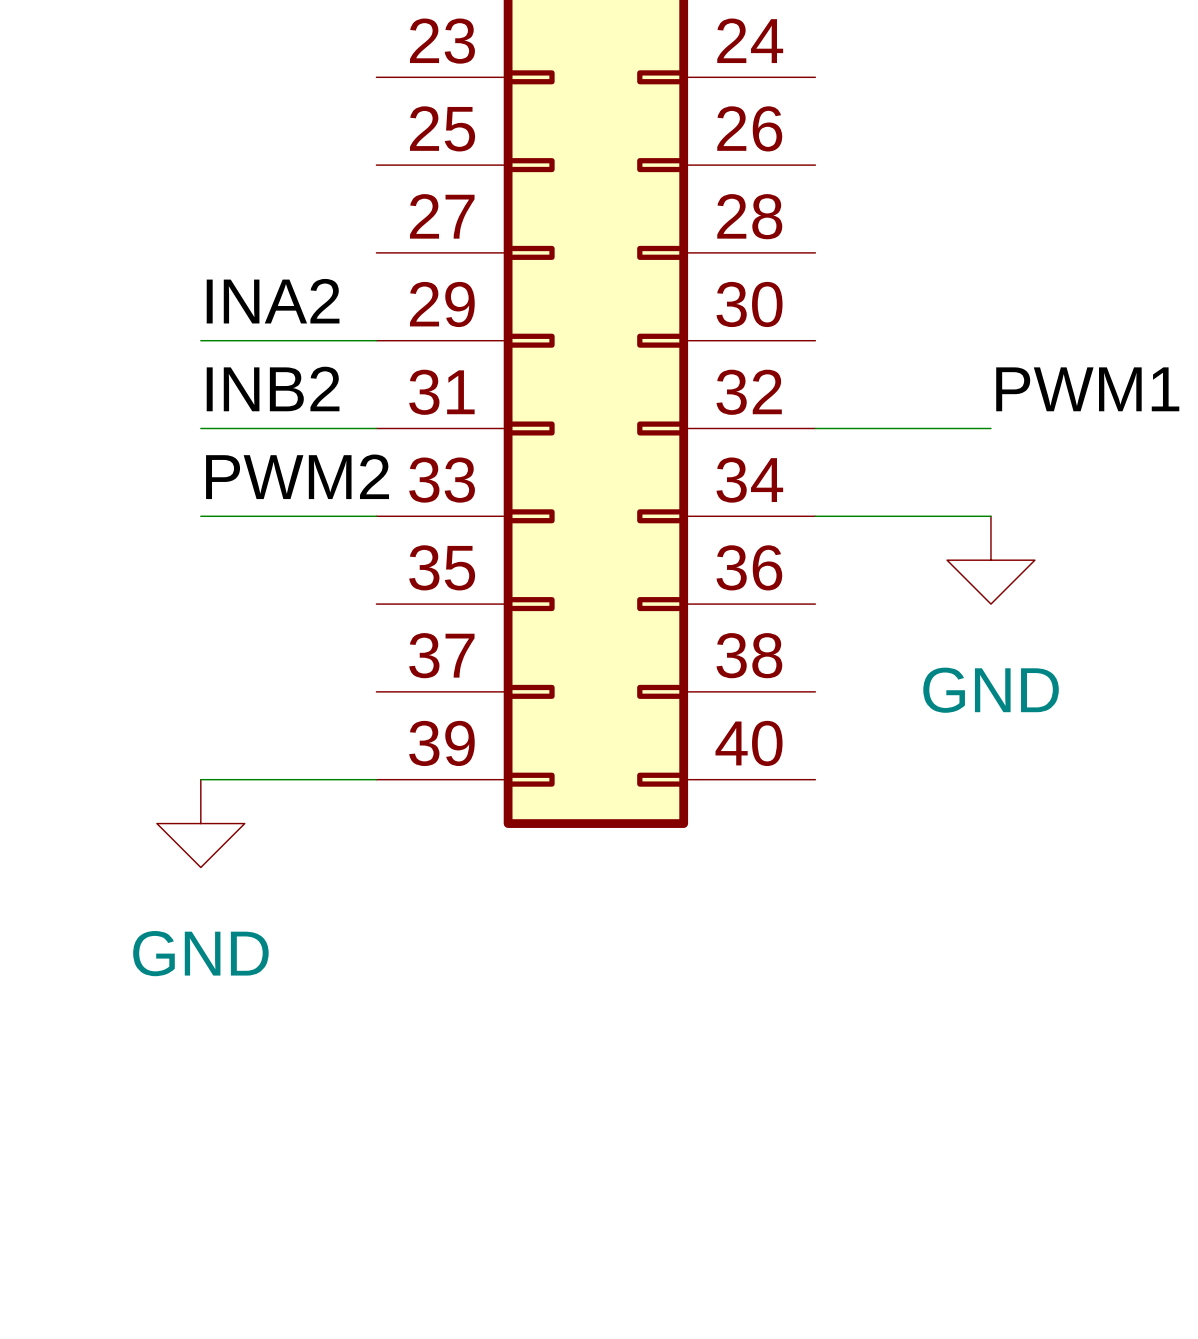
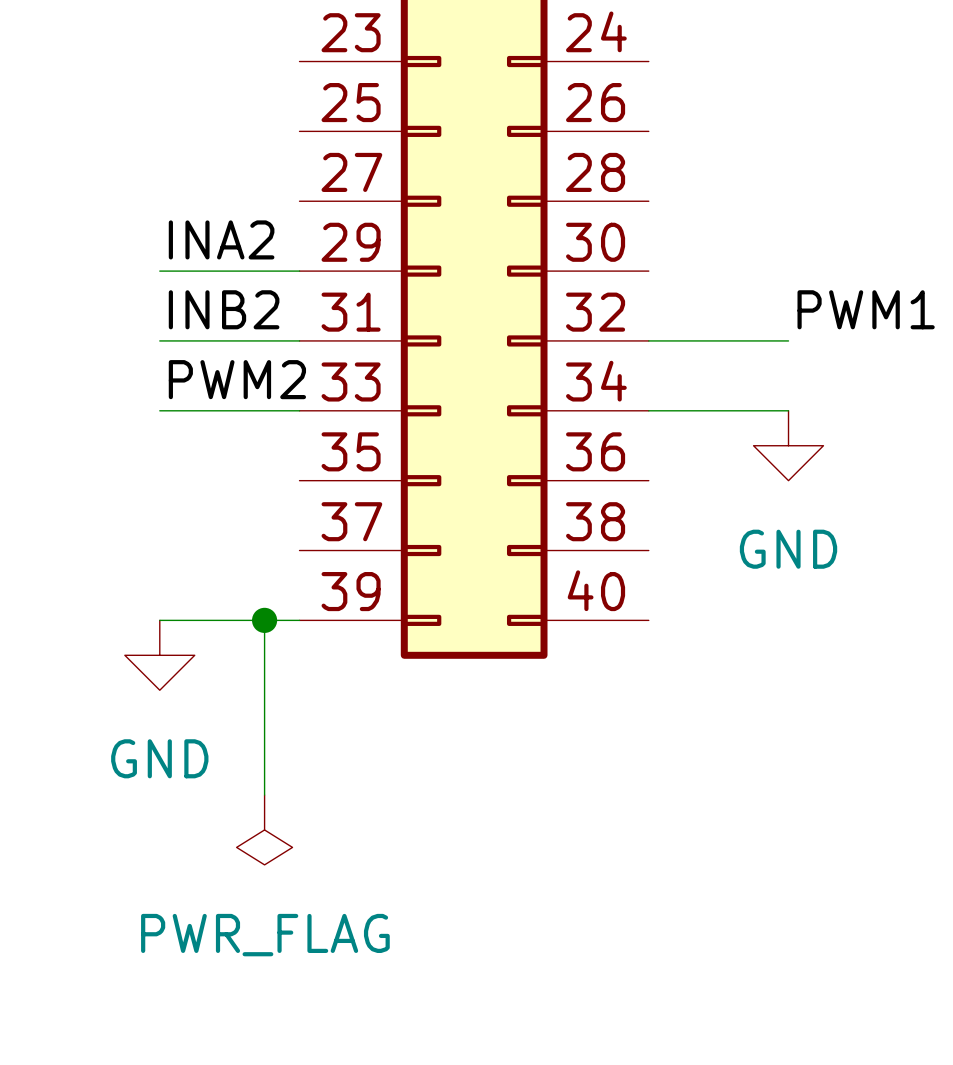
wire: none -> (264, 620) (264, 795)
junction: none -> (264, 620)
power symbol: none -> PWR_FLAG (264, 829)

